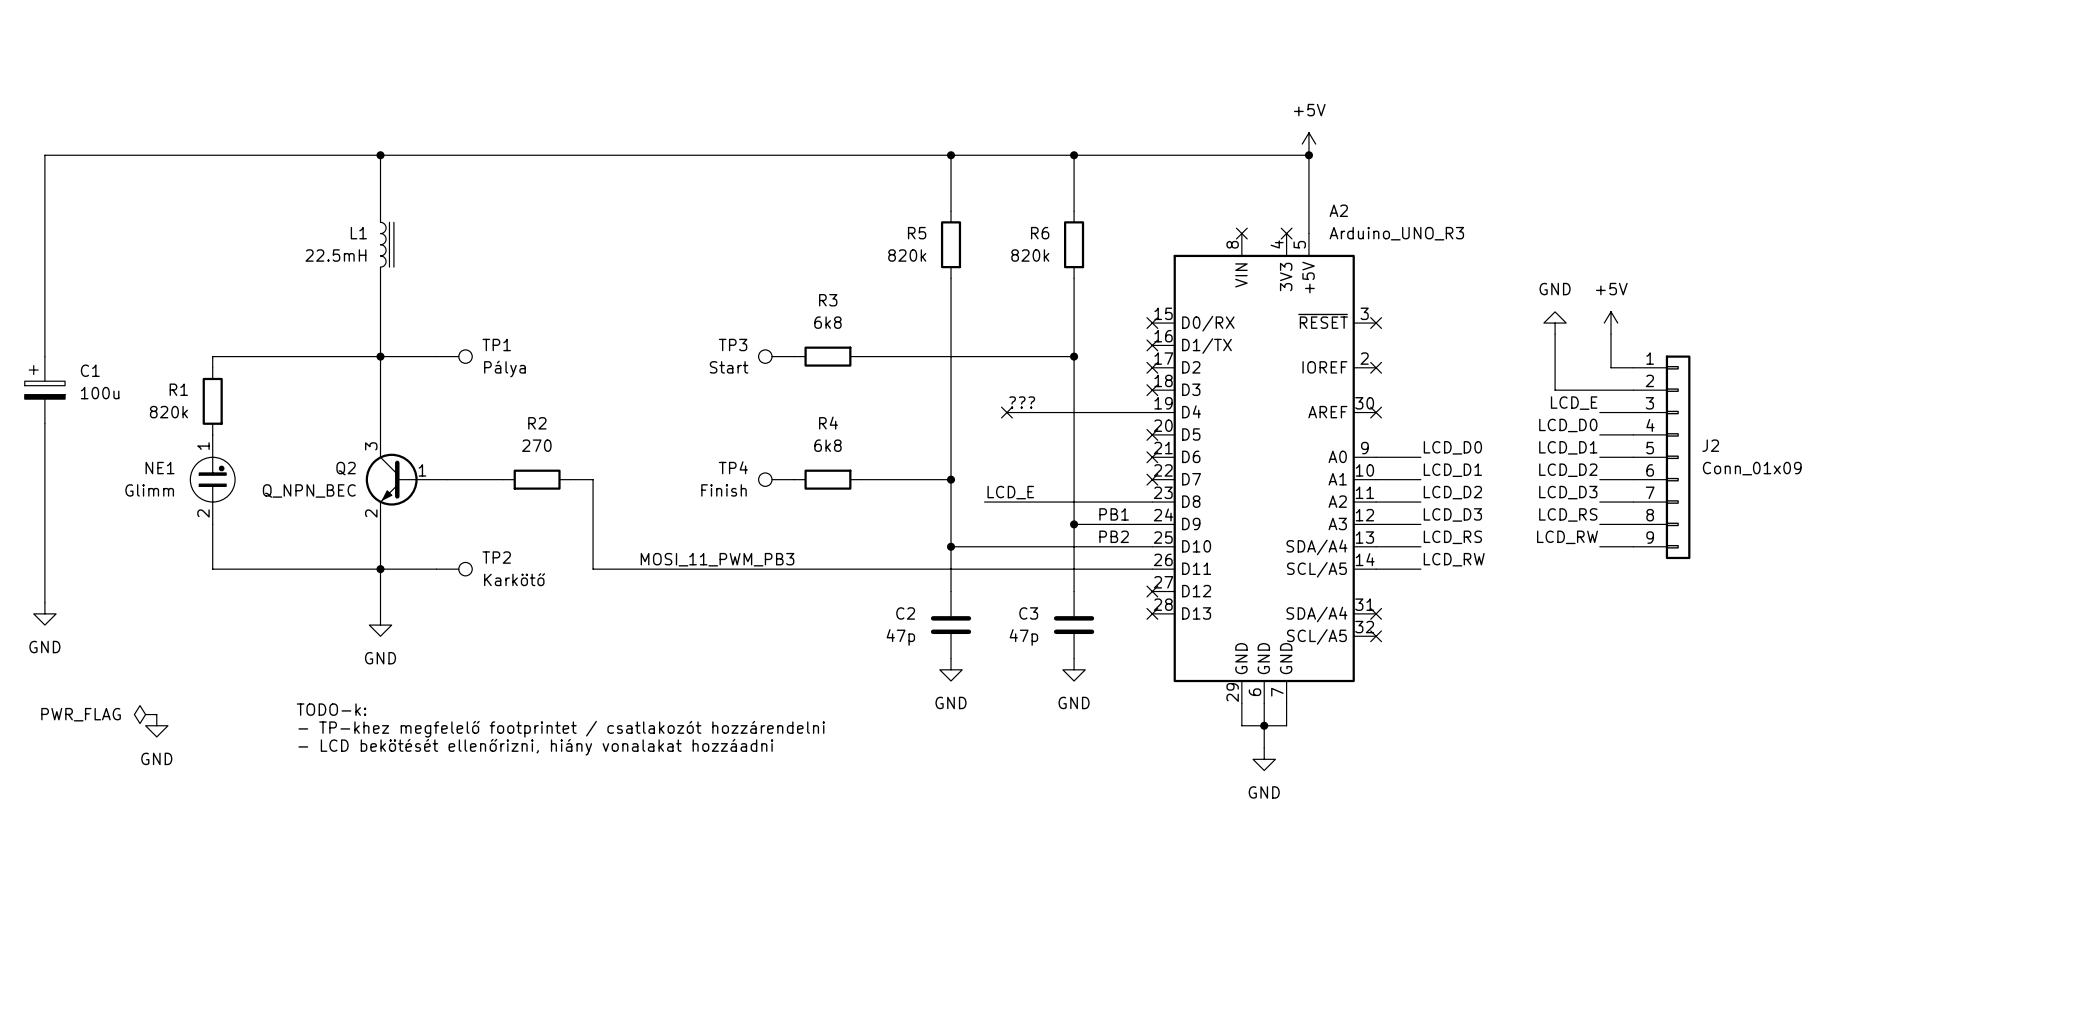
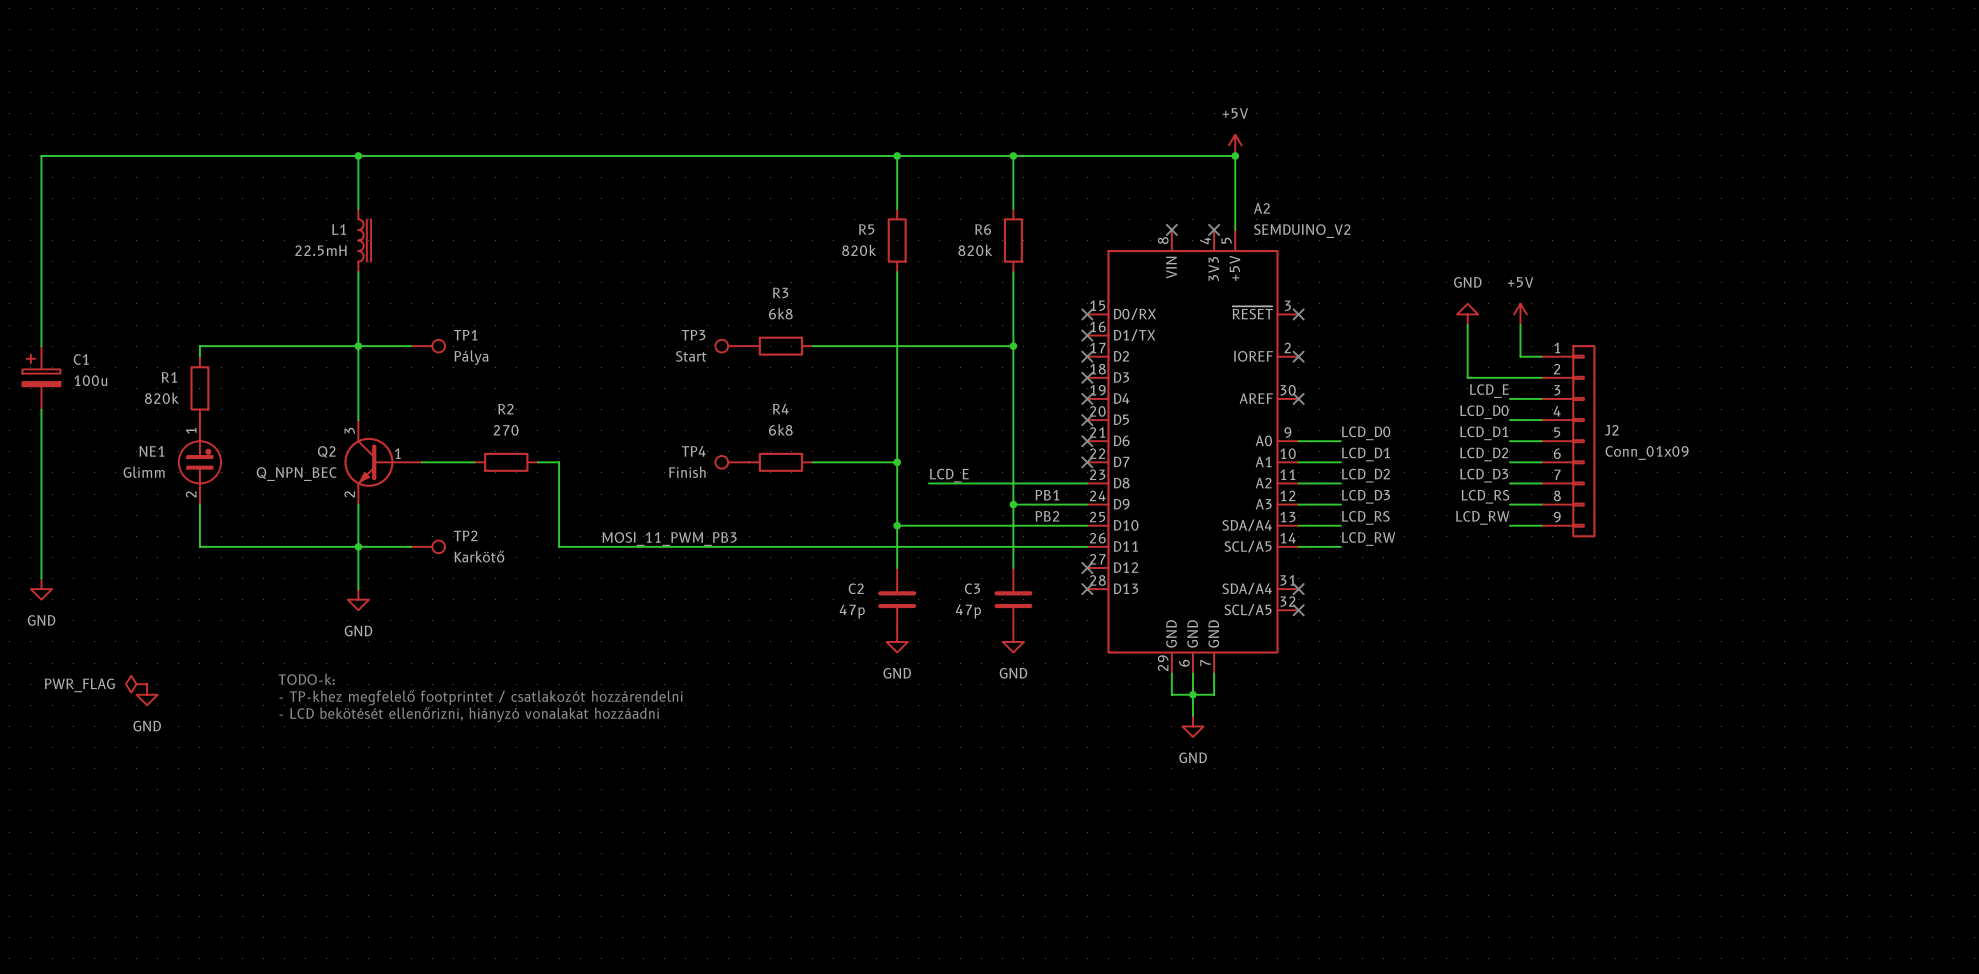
A2 value: Arduino_UNO_R3 (1396, 233) -> SEMDUINO_V2 (1302, 231)
label: ??? (1022, 402) -> none
wire: (1006, 412) (1152, 412) -> none
no-connect mark: (1006, 412) -> none
no-connect mark: none -> (1087, 398)
text: - LCD bekötését ellenőrizni, hiány vonalakat hozzáadni (535, 747) -> - LCD bekötését ellenőrizni, hiányzó vonalakat hozzáadni (469, 714)

